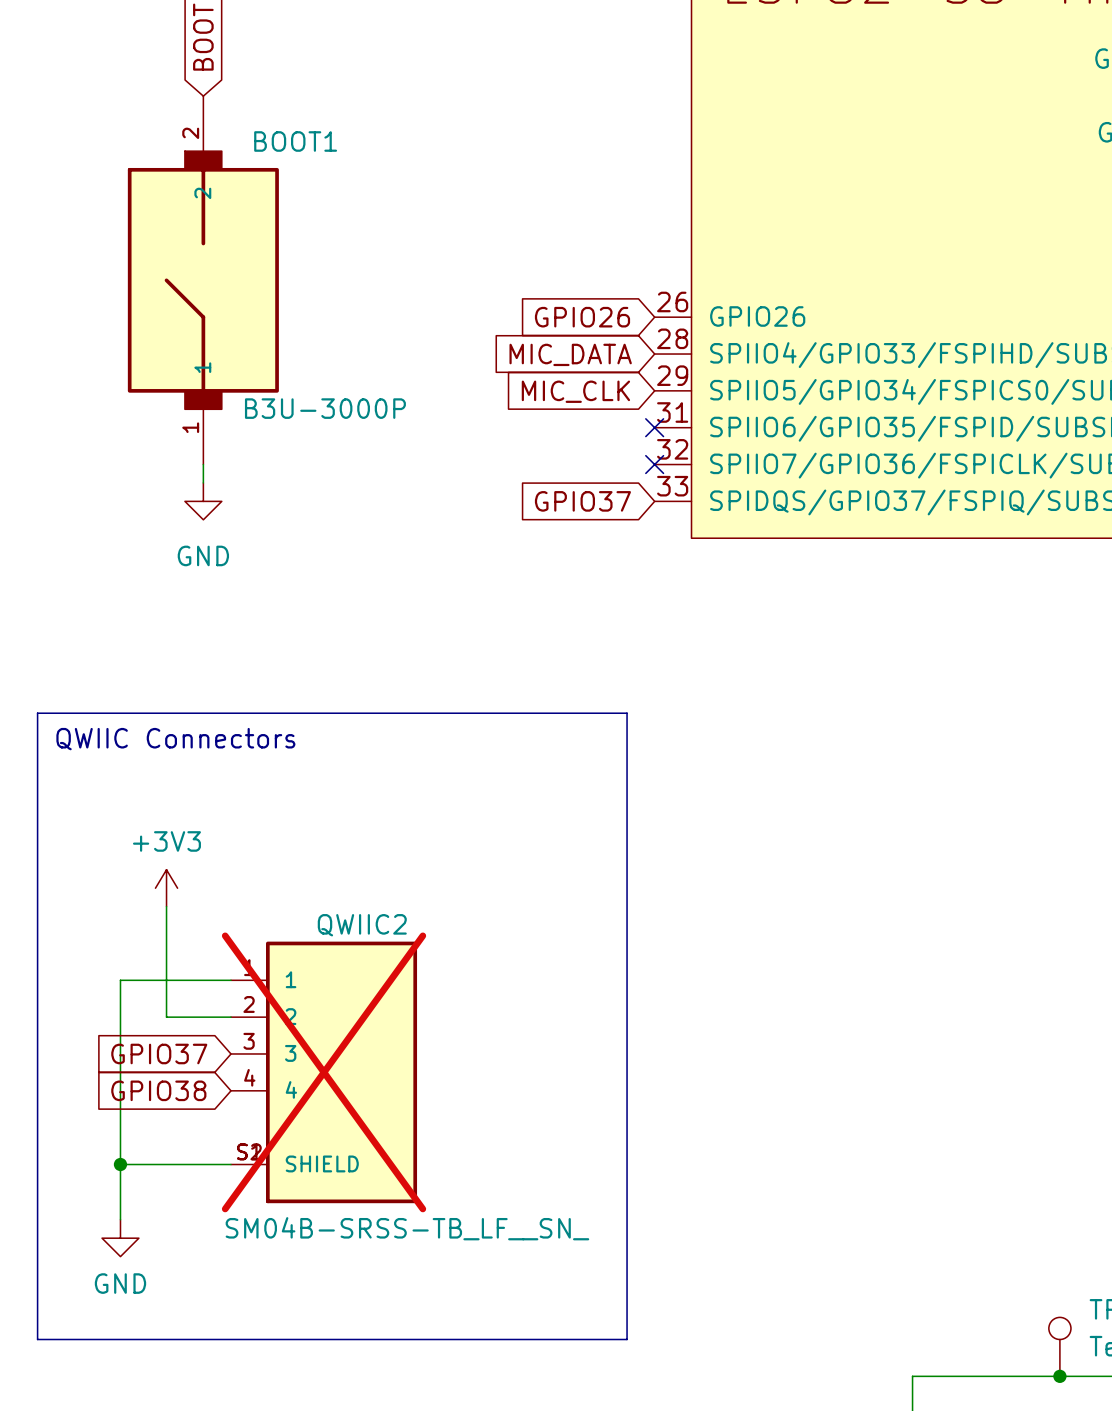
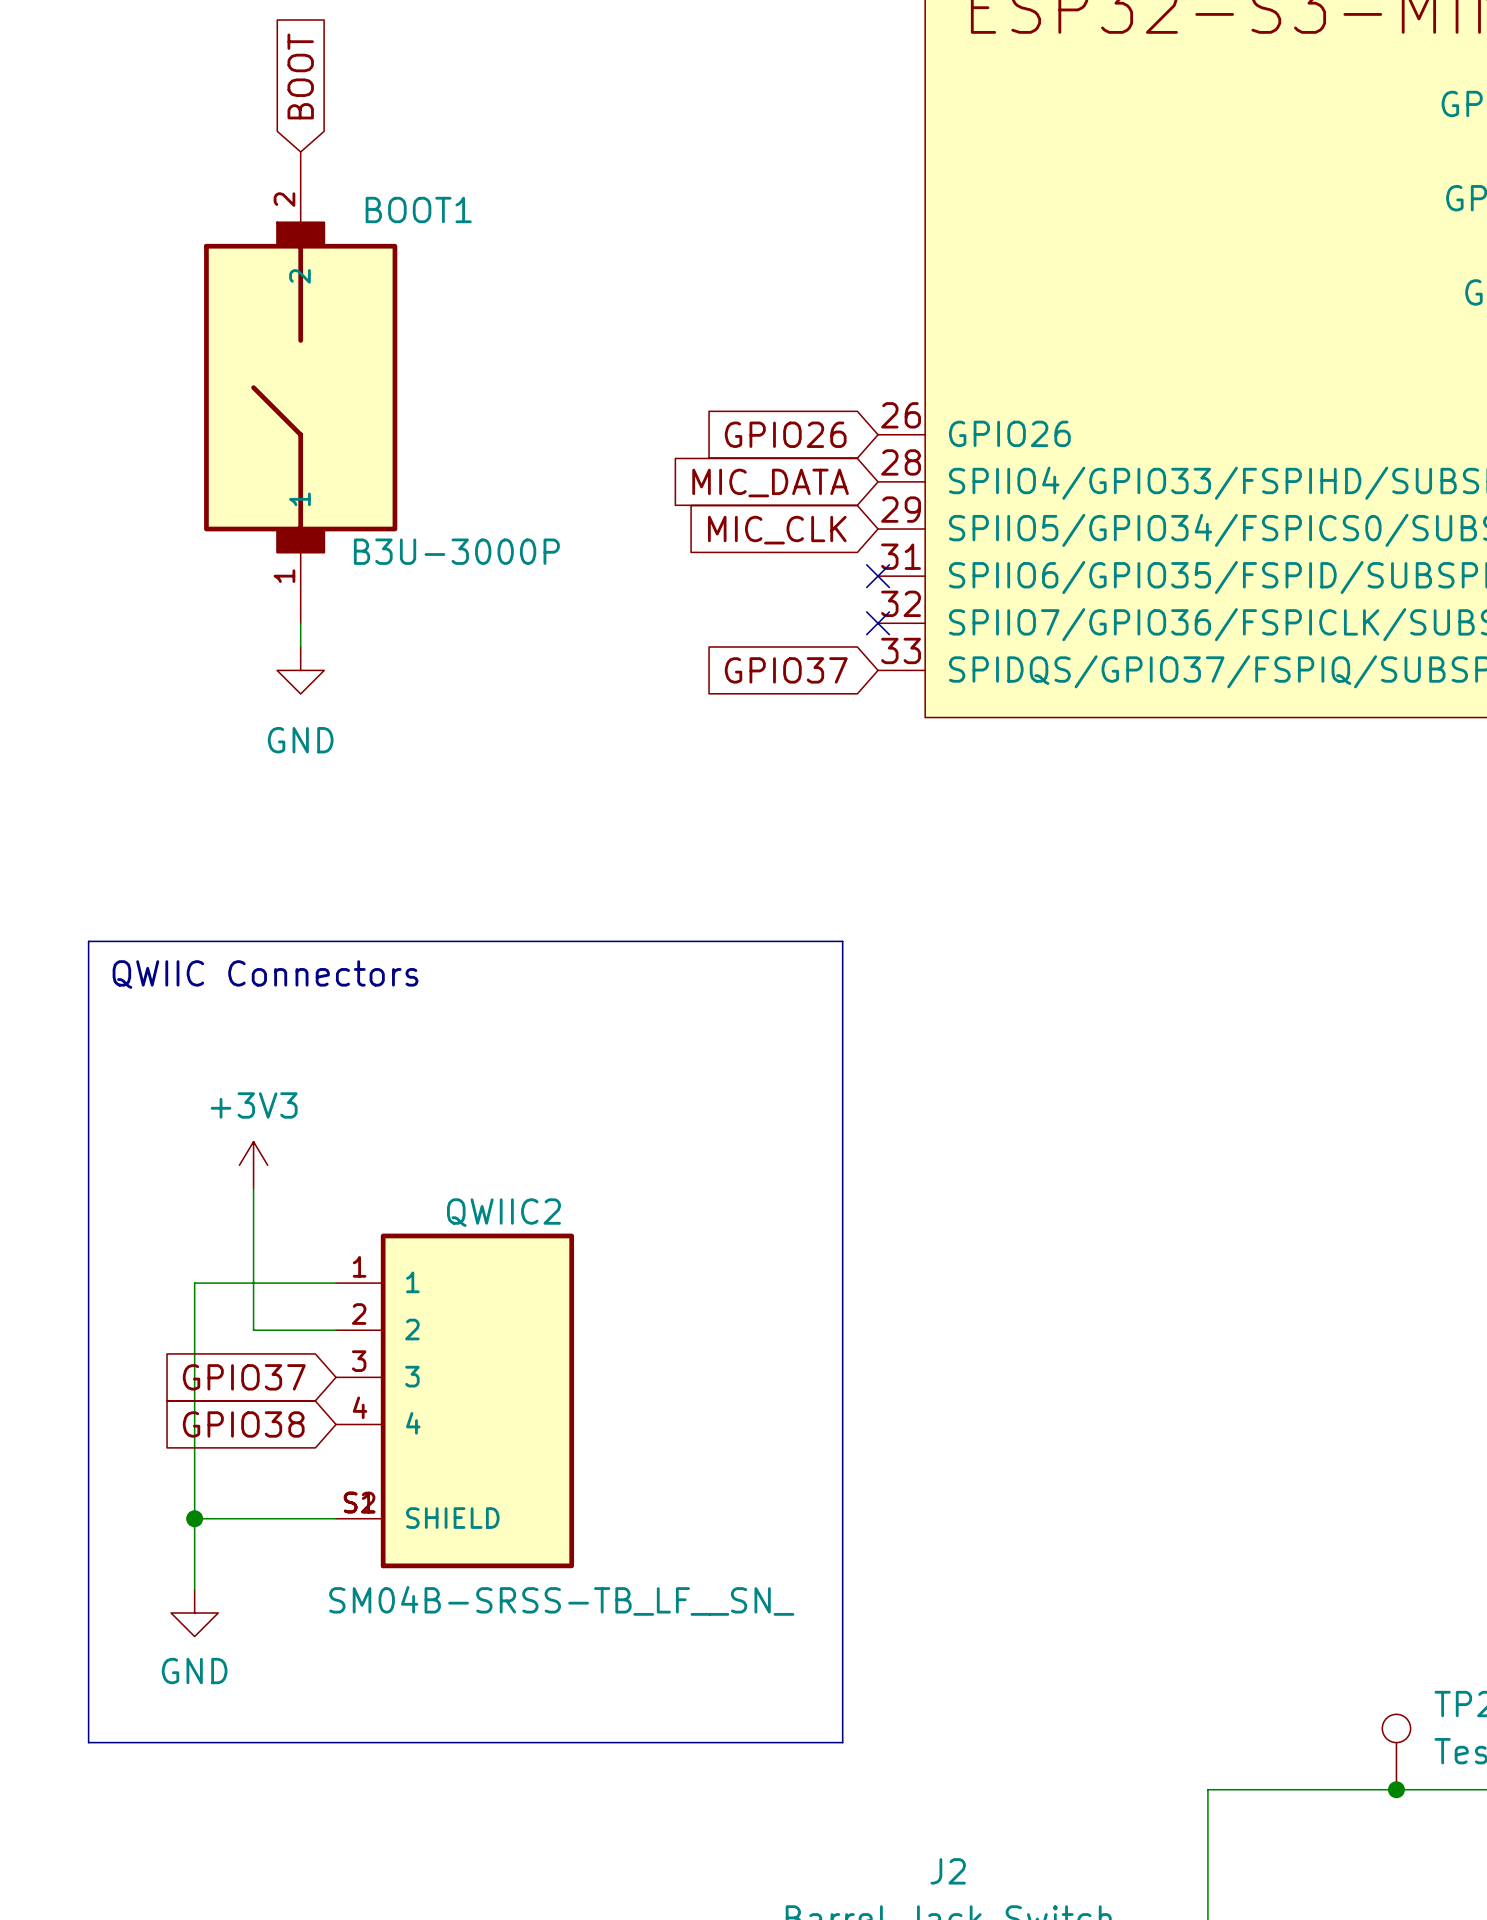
QWIIC2 do-not-place cross: (324, 1072) -> none

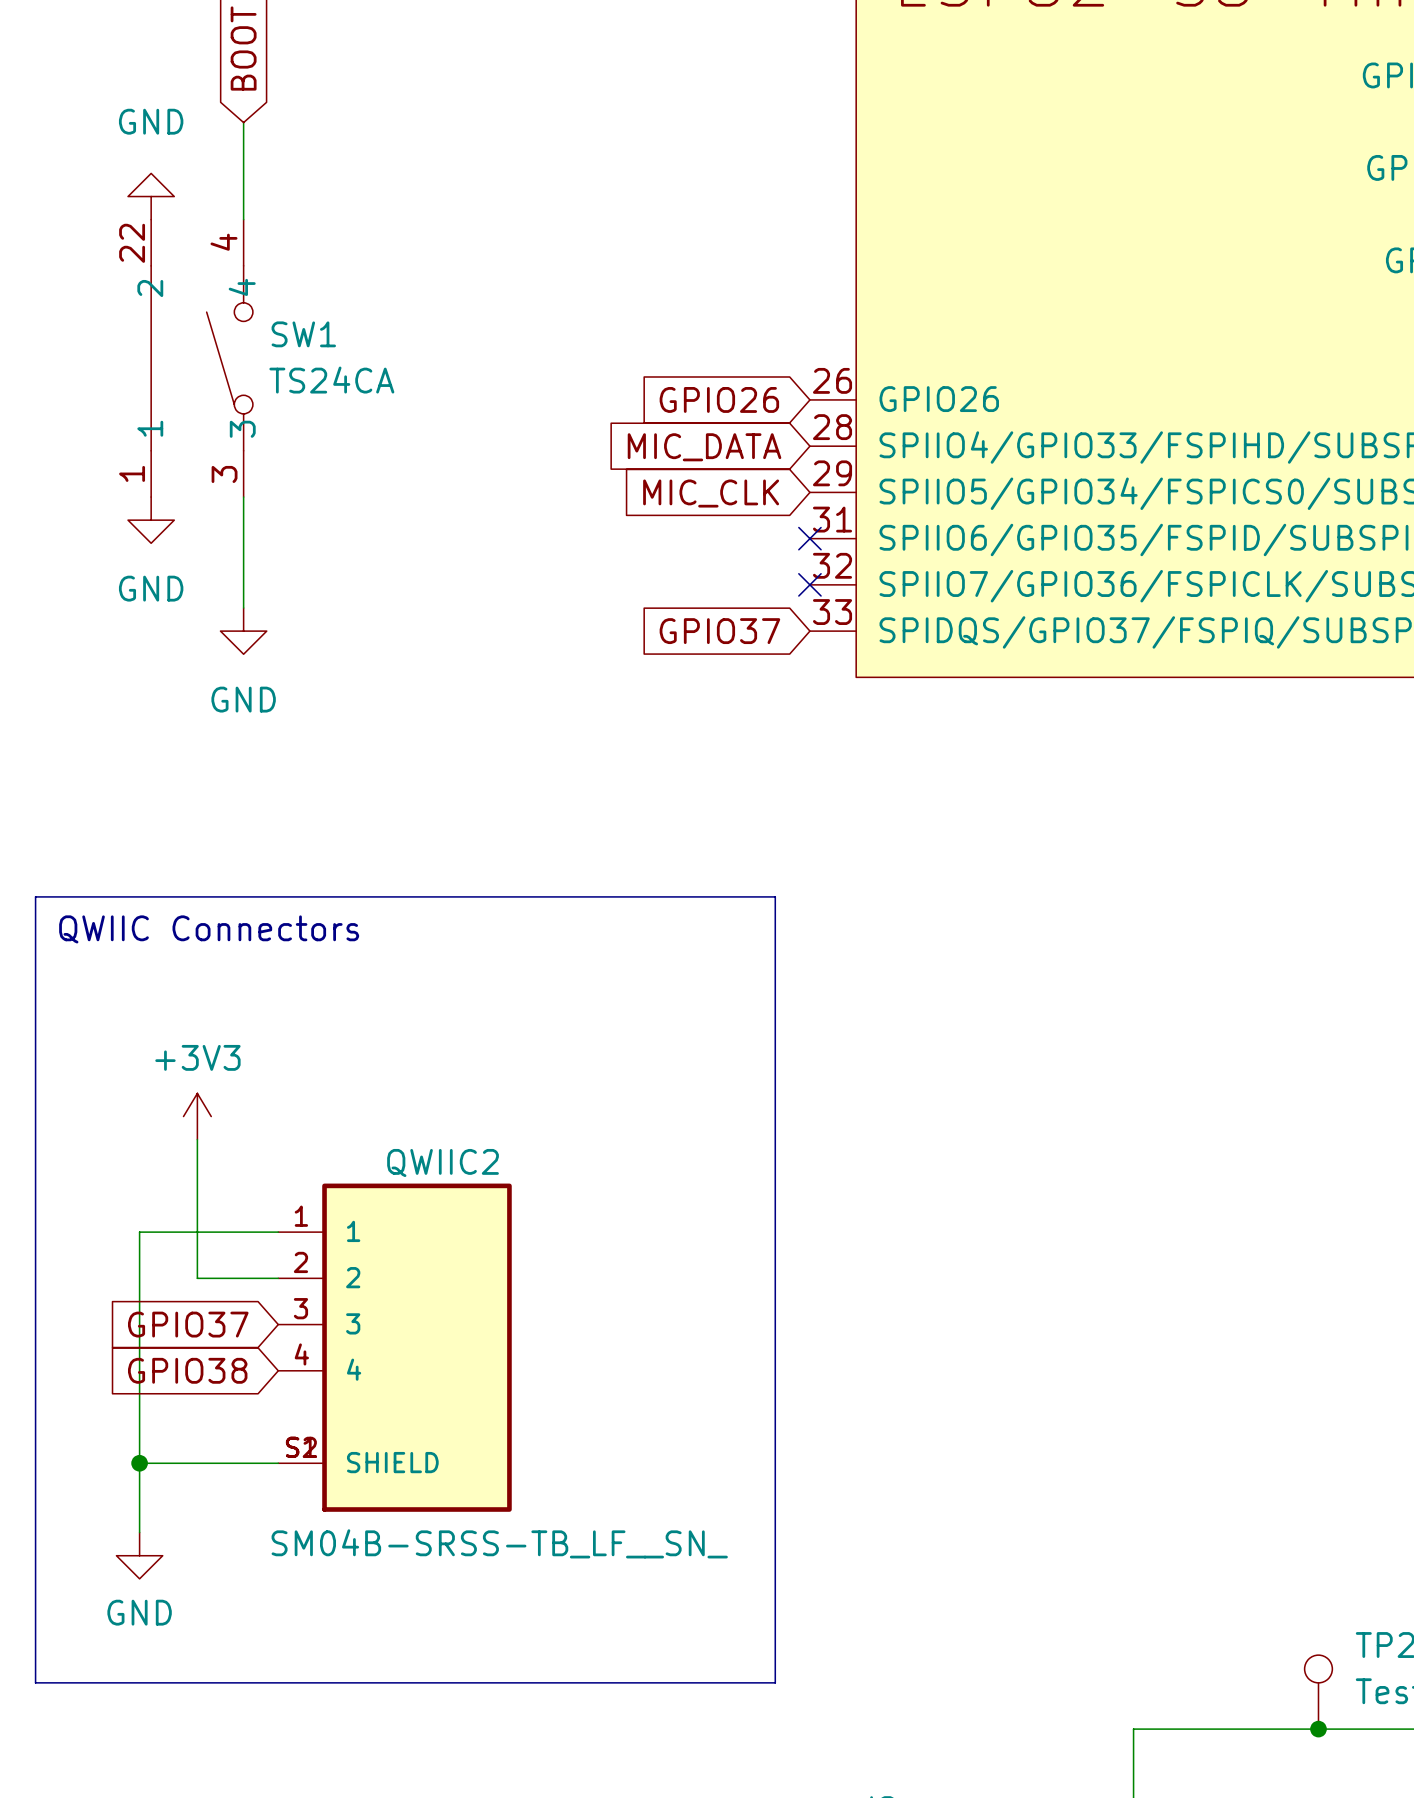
power symbol: none -> GND (151, 196)
BOOT1: B3U-3000P (300, 387) -> none
SW1: none -> TS24CA (202, 358)
power symbol: none -> GND (151, 520)

